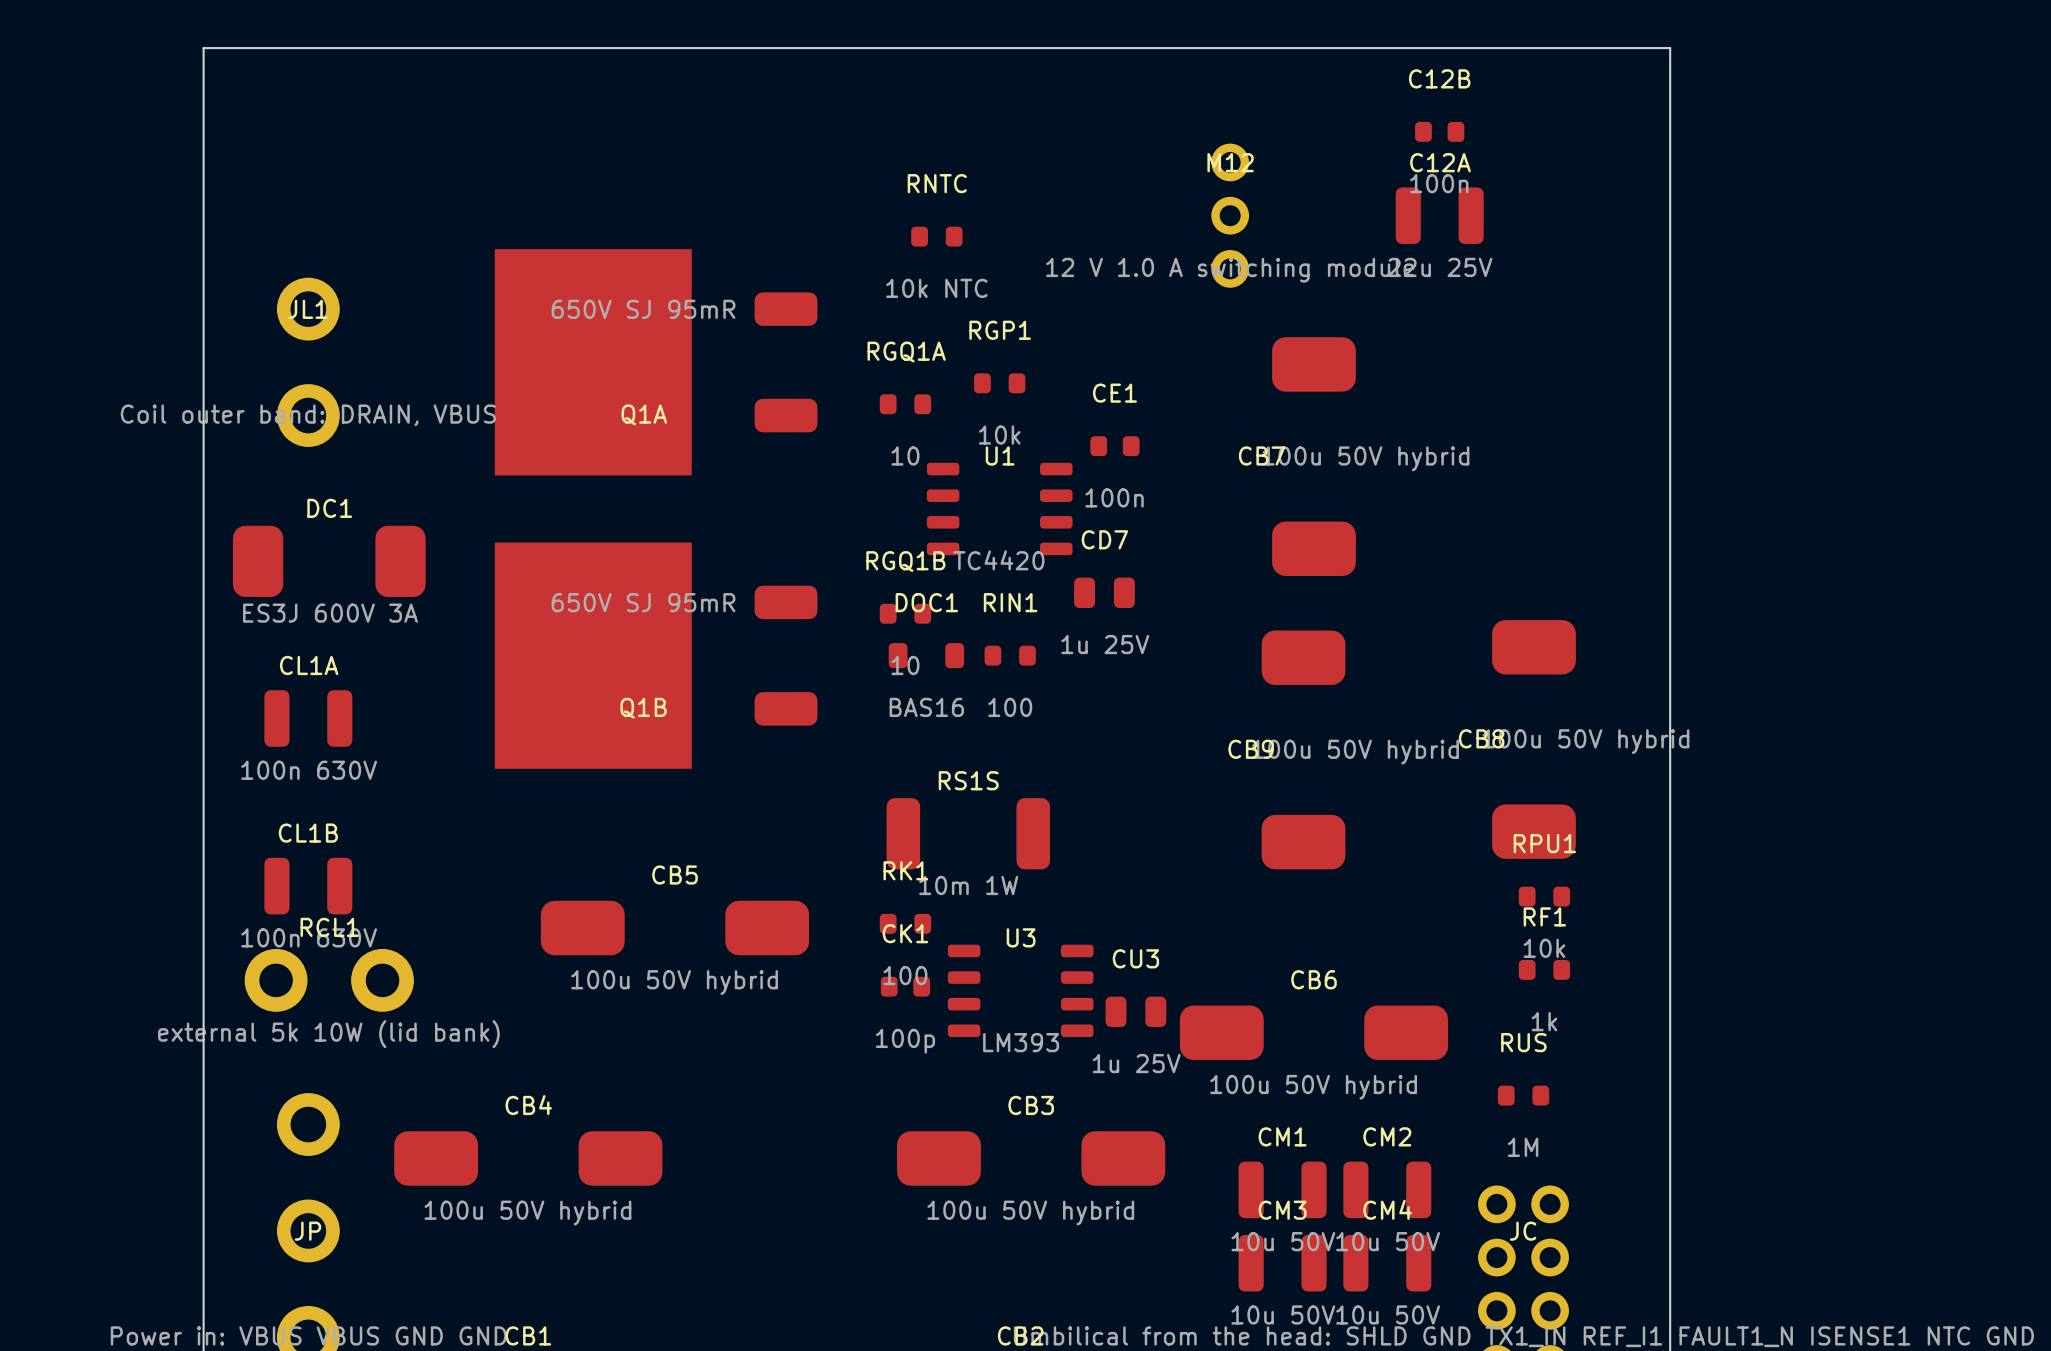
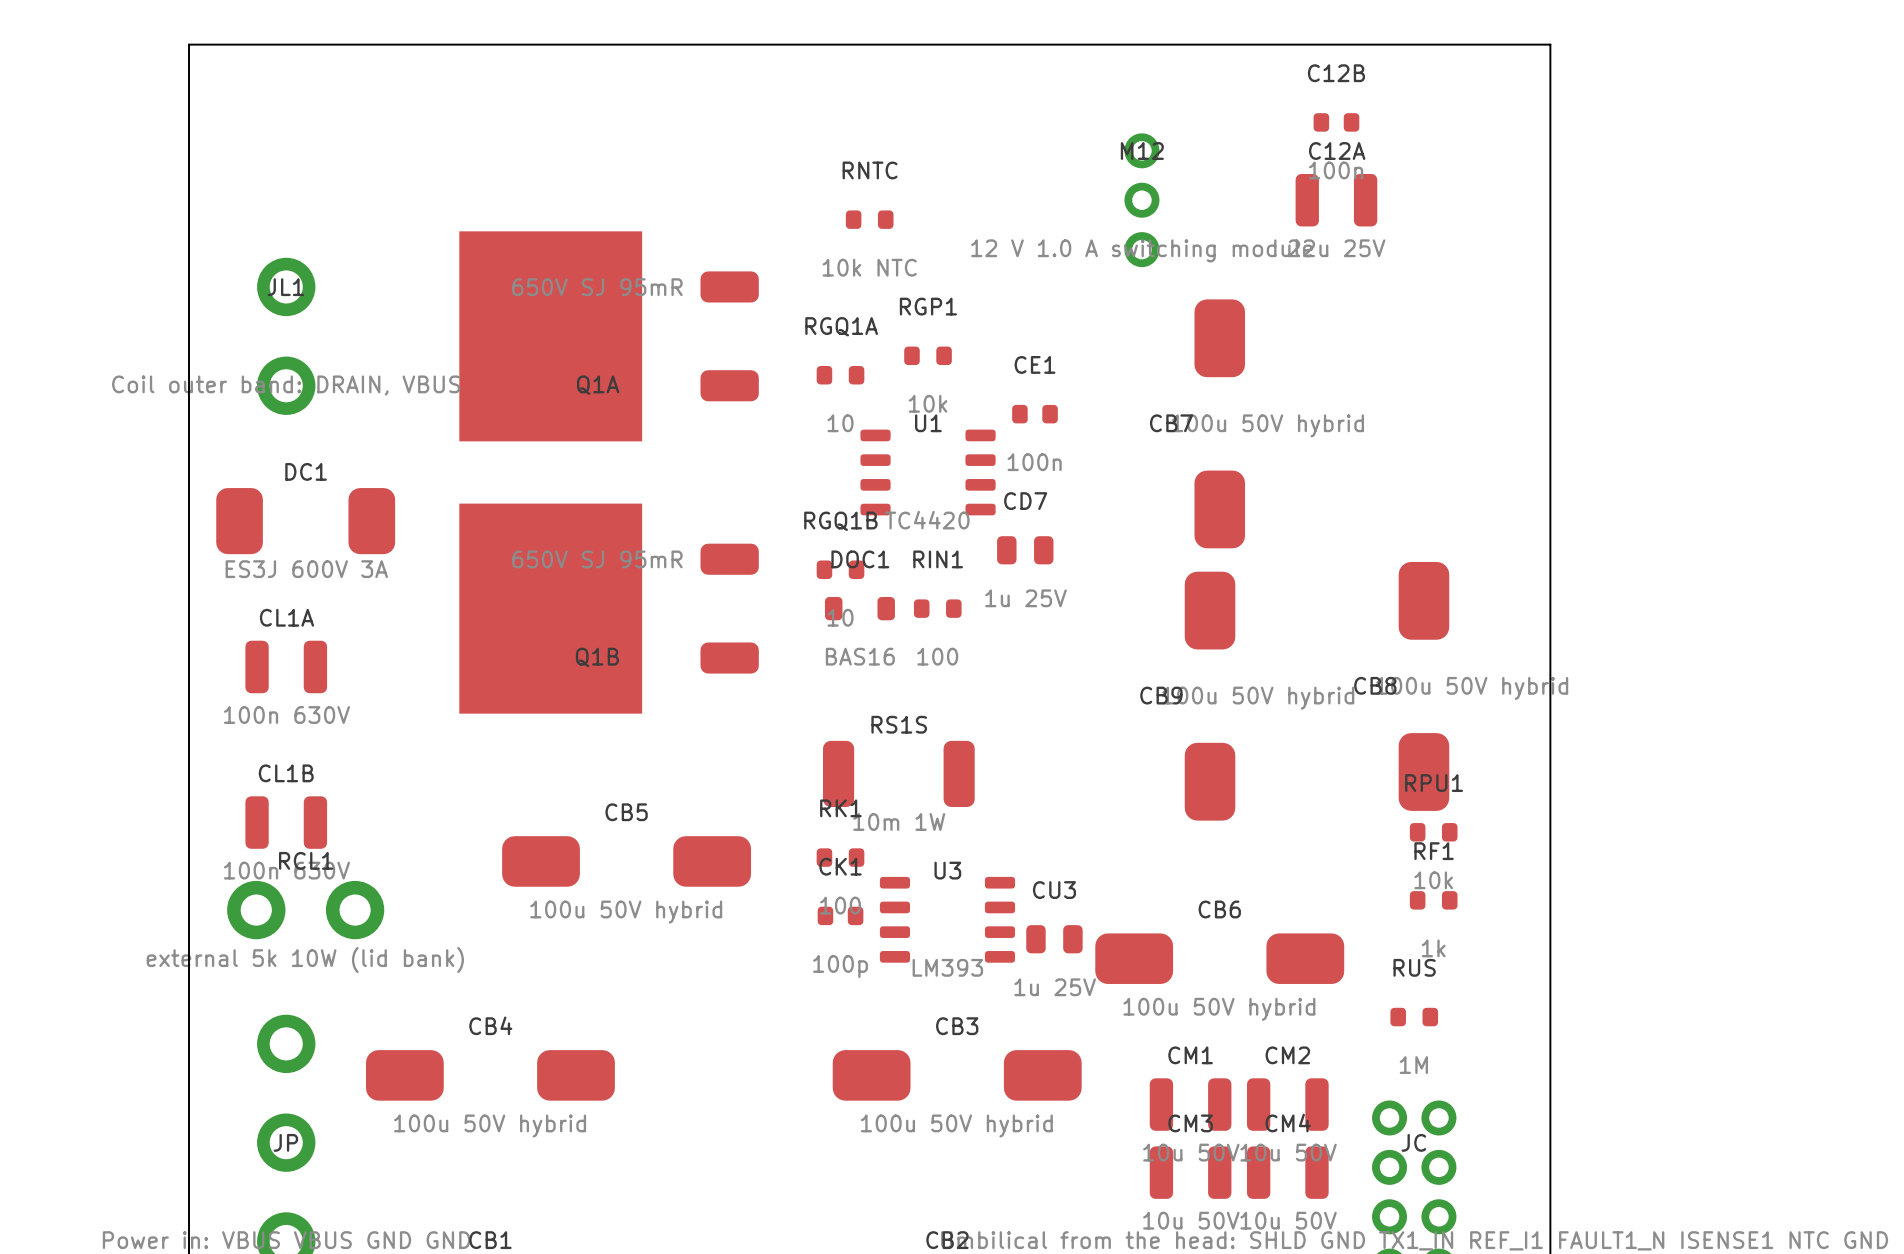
CB7 footprint: [1272, 337, 1356, 577] -> [1194, 299, 1246, 549]
CB8 footprint: [1492, 620, 1576, 859] -> [1398, 561, 1450, 811]
CB9 footprint: [1261, 630, 1346, 870] -> [1184, 571, 1236, 821]

